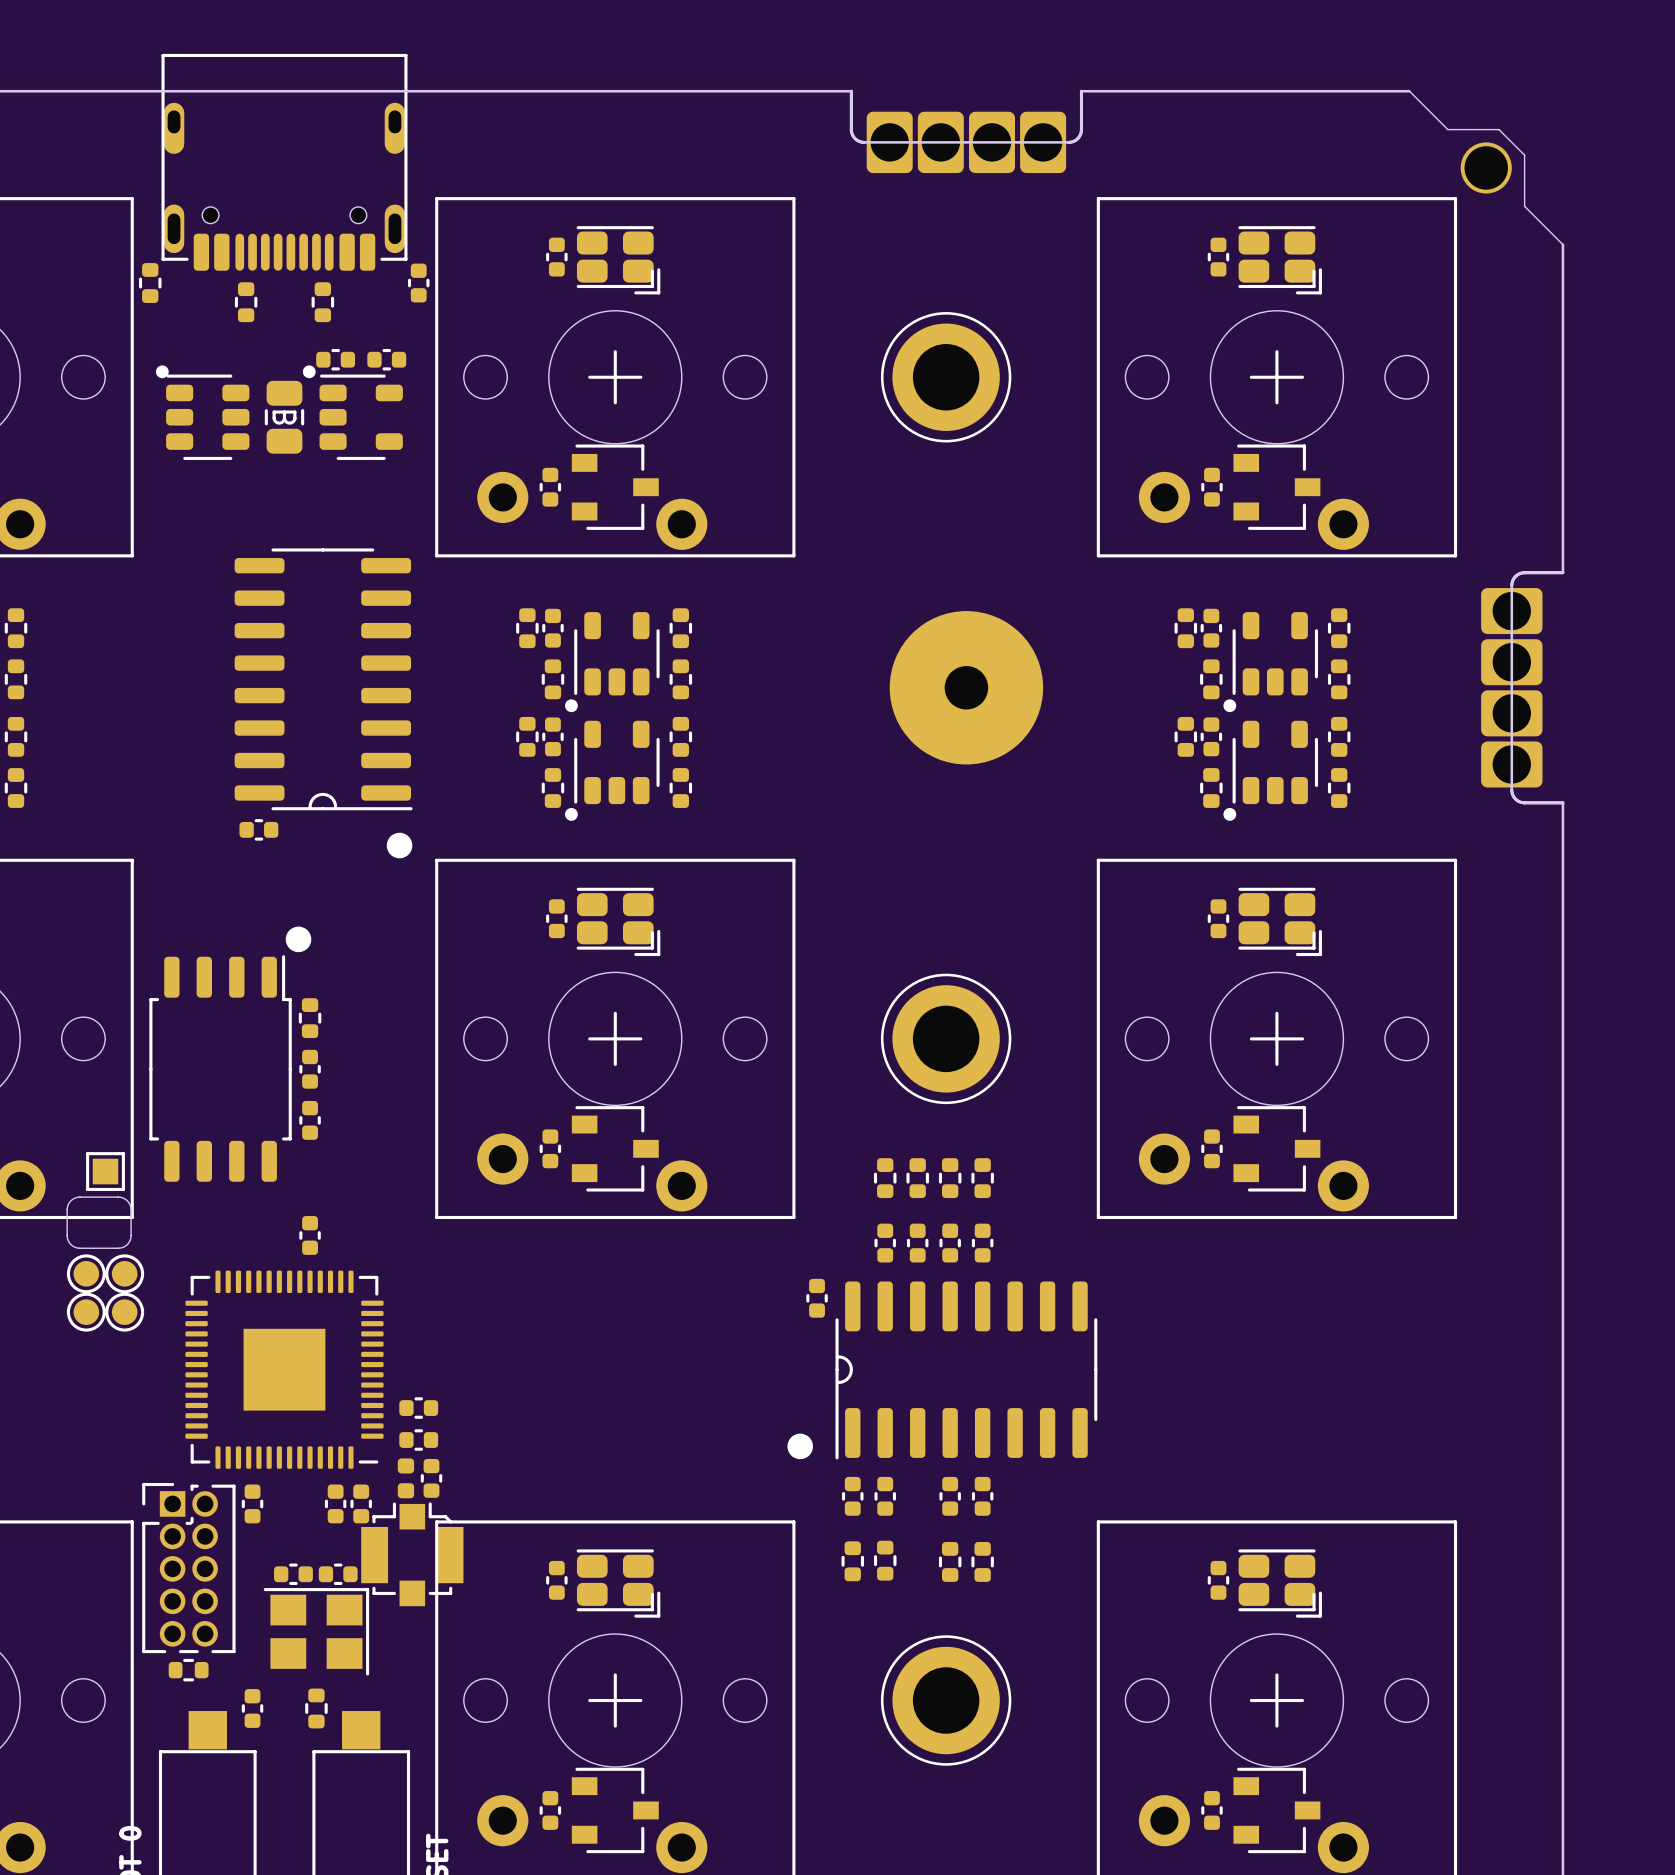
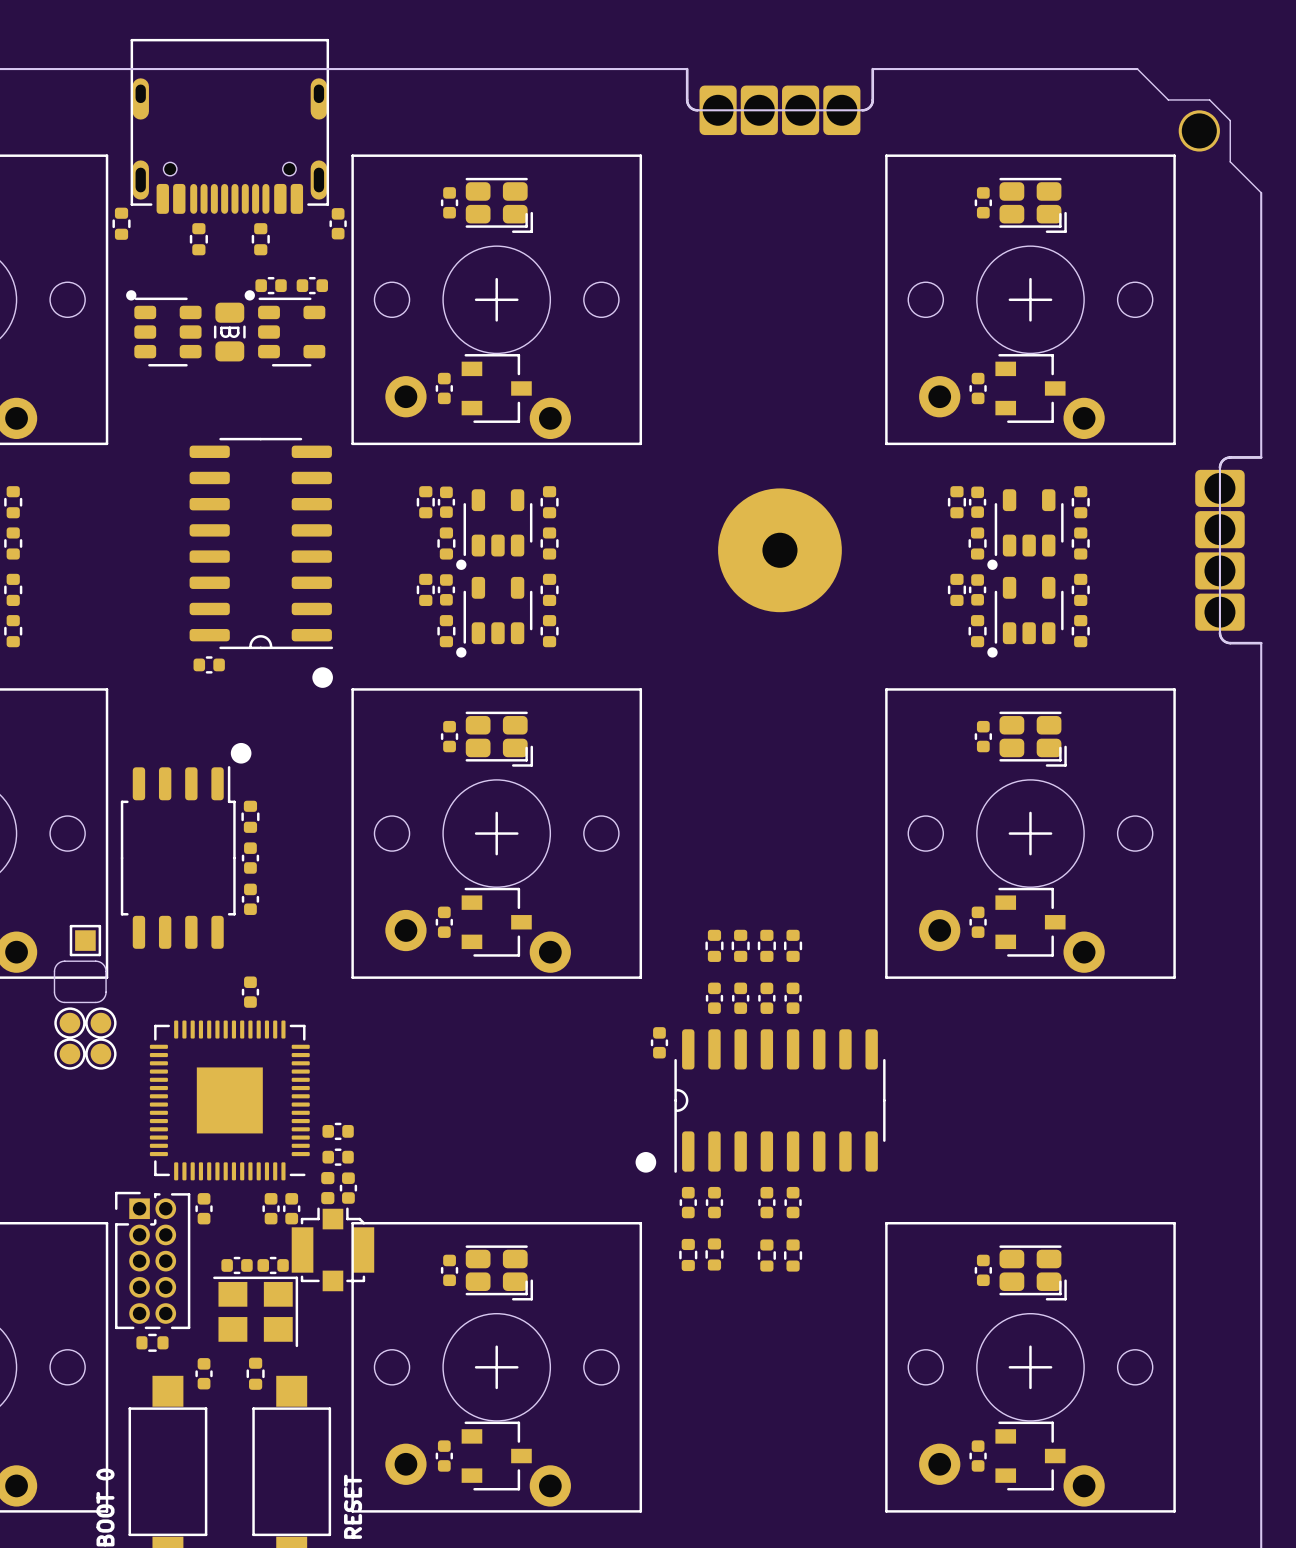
part: (946, 377) -> none
part: (946, 1038) -> none
part: (946, 1700) -> none

